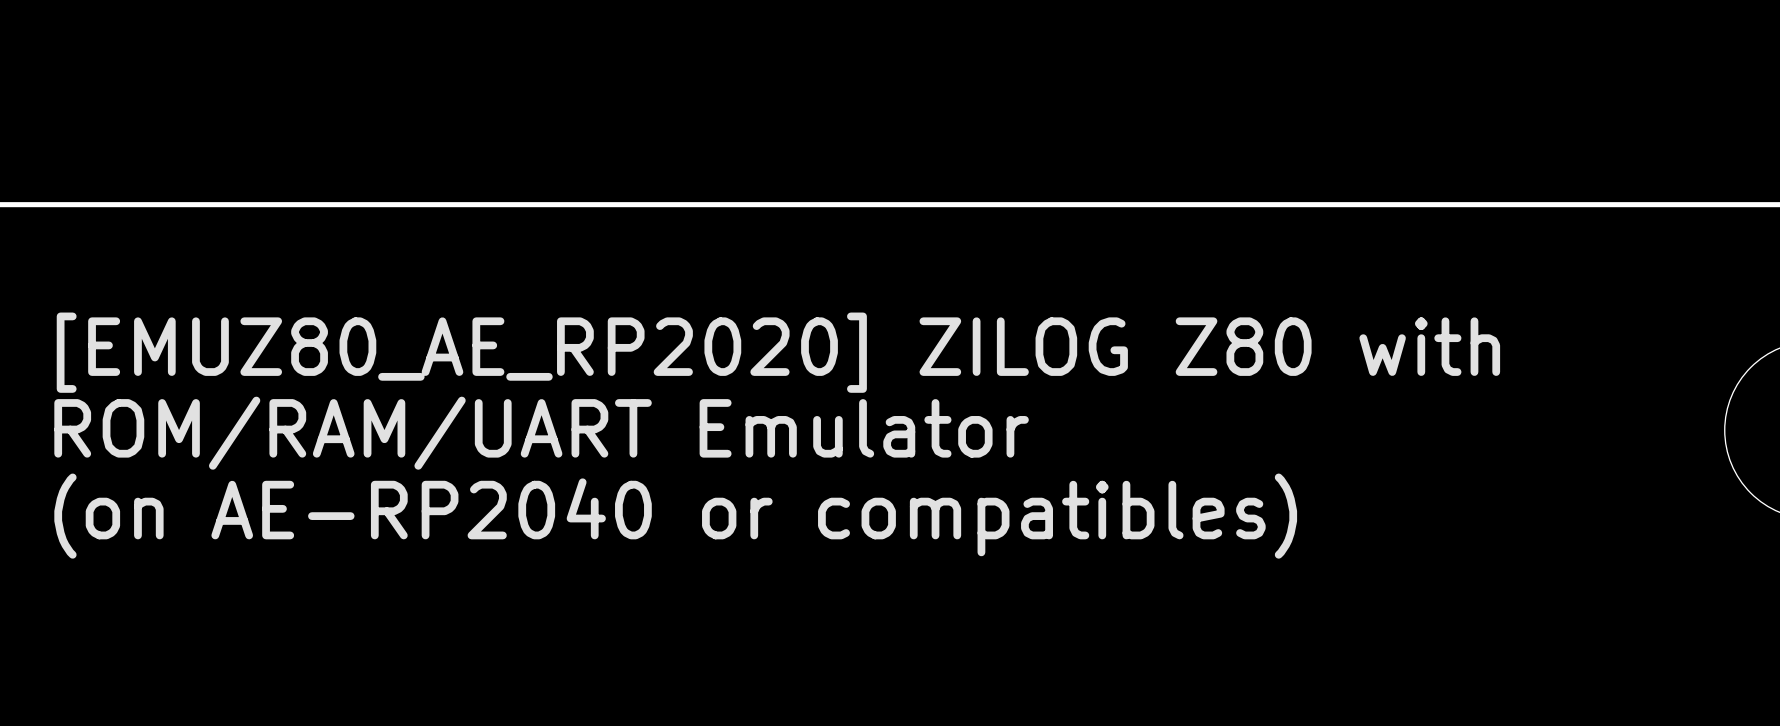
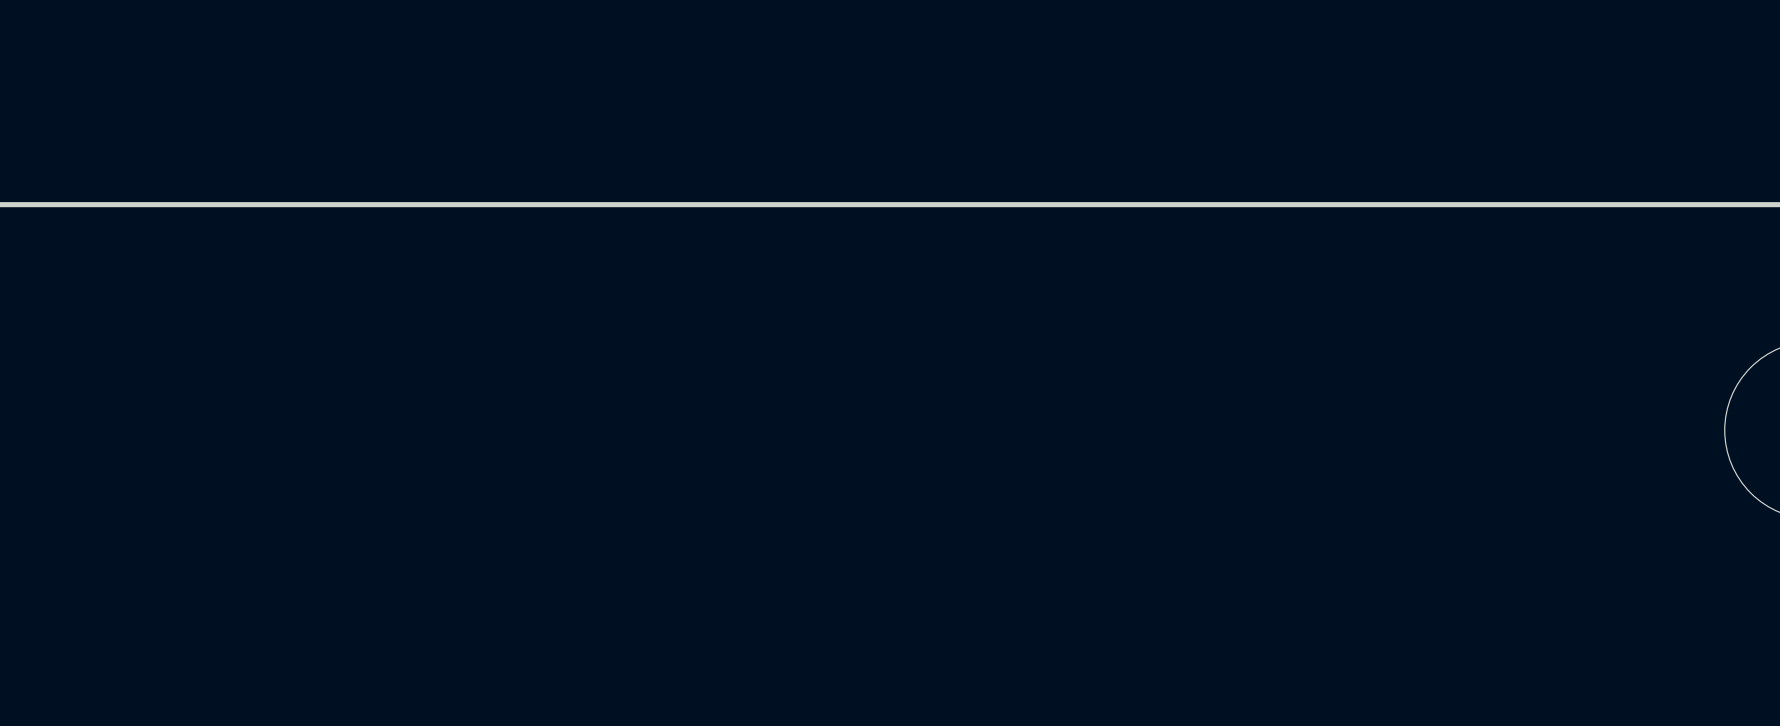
text: [EMUZ80_AE_RP2020] ZILOG Z80 with (778, 352) -> none
text: ROM/RAM/UART Emulator (541, 433) -> none
text: (on AE-RP2040 or compatibles) (675, 516) -> none

